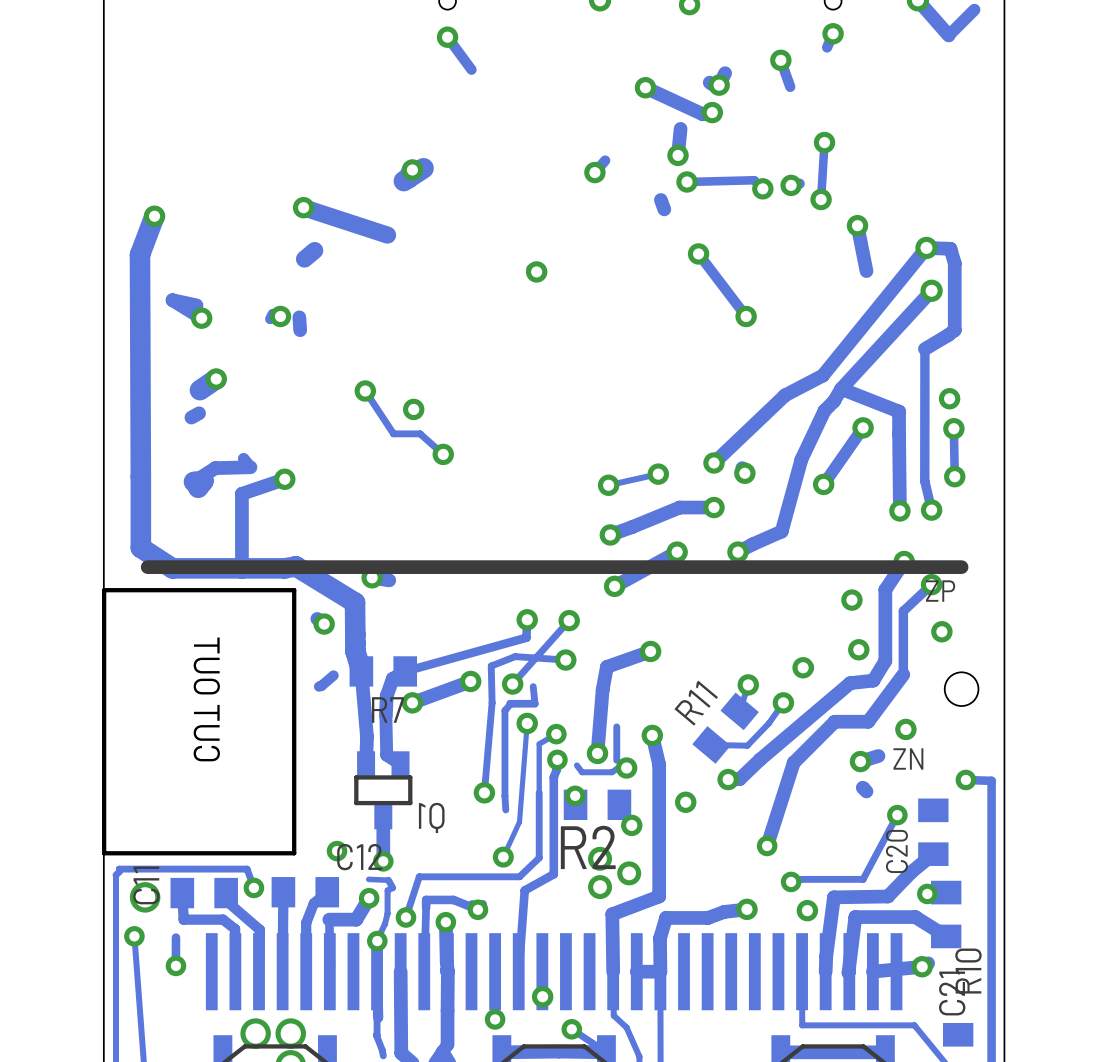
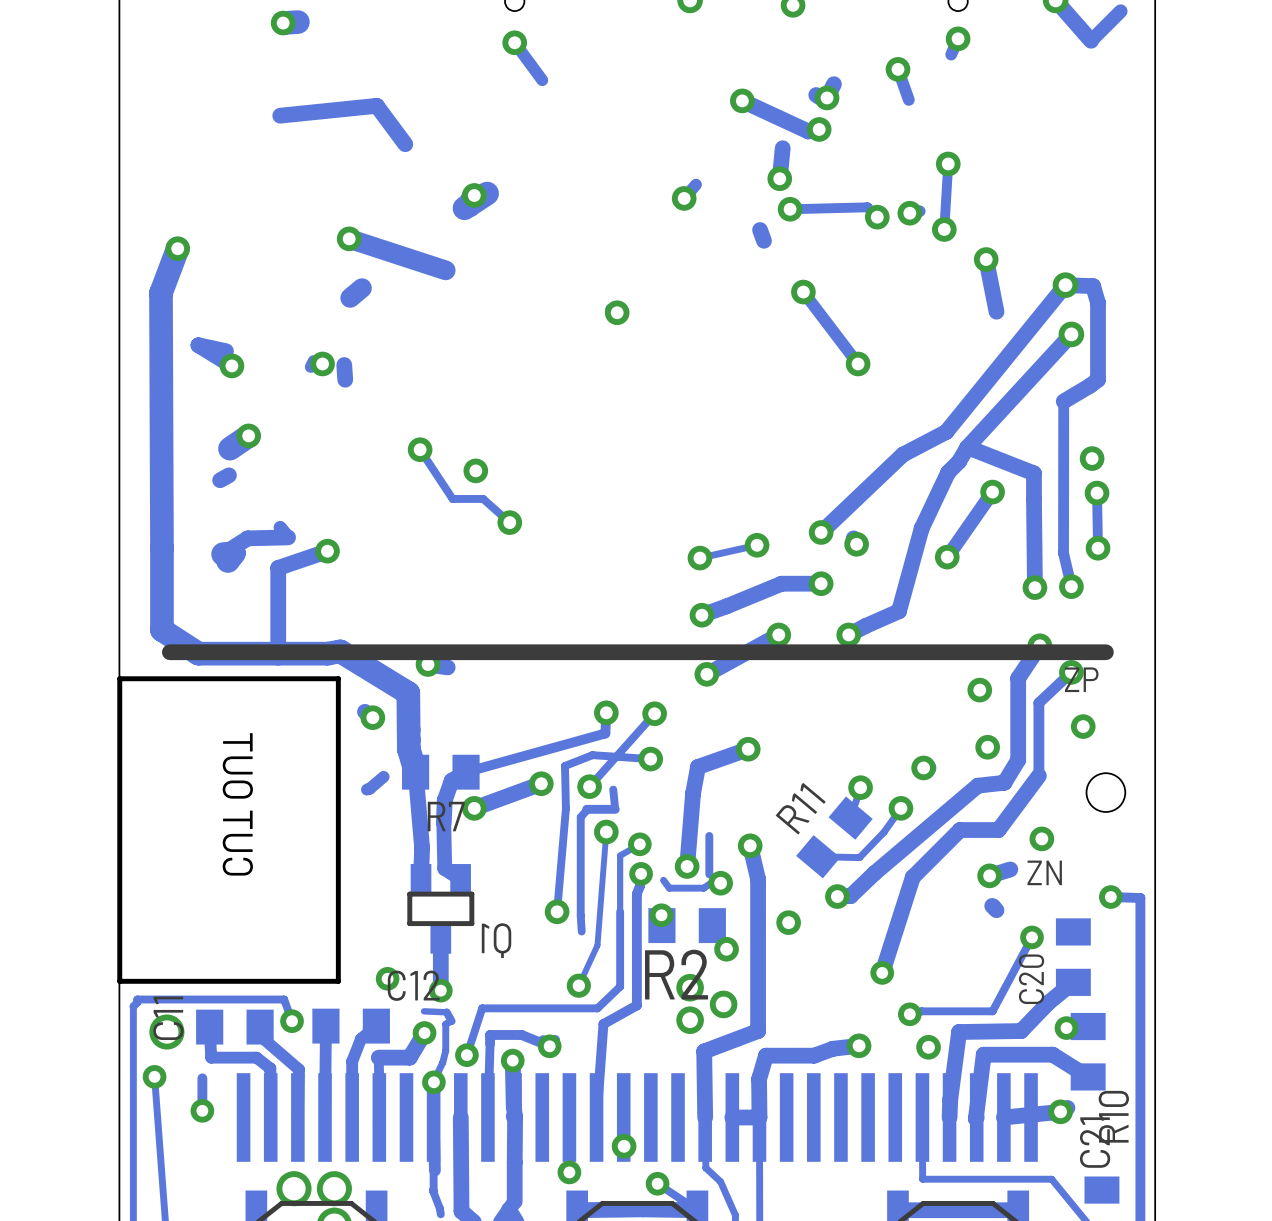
track: none -> (297, 22) (283, 23)
via: none -> (283, 23)
track: none -> (280, 115) (376, 105) (405, 144)

